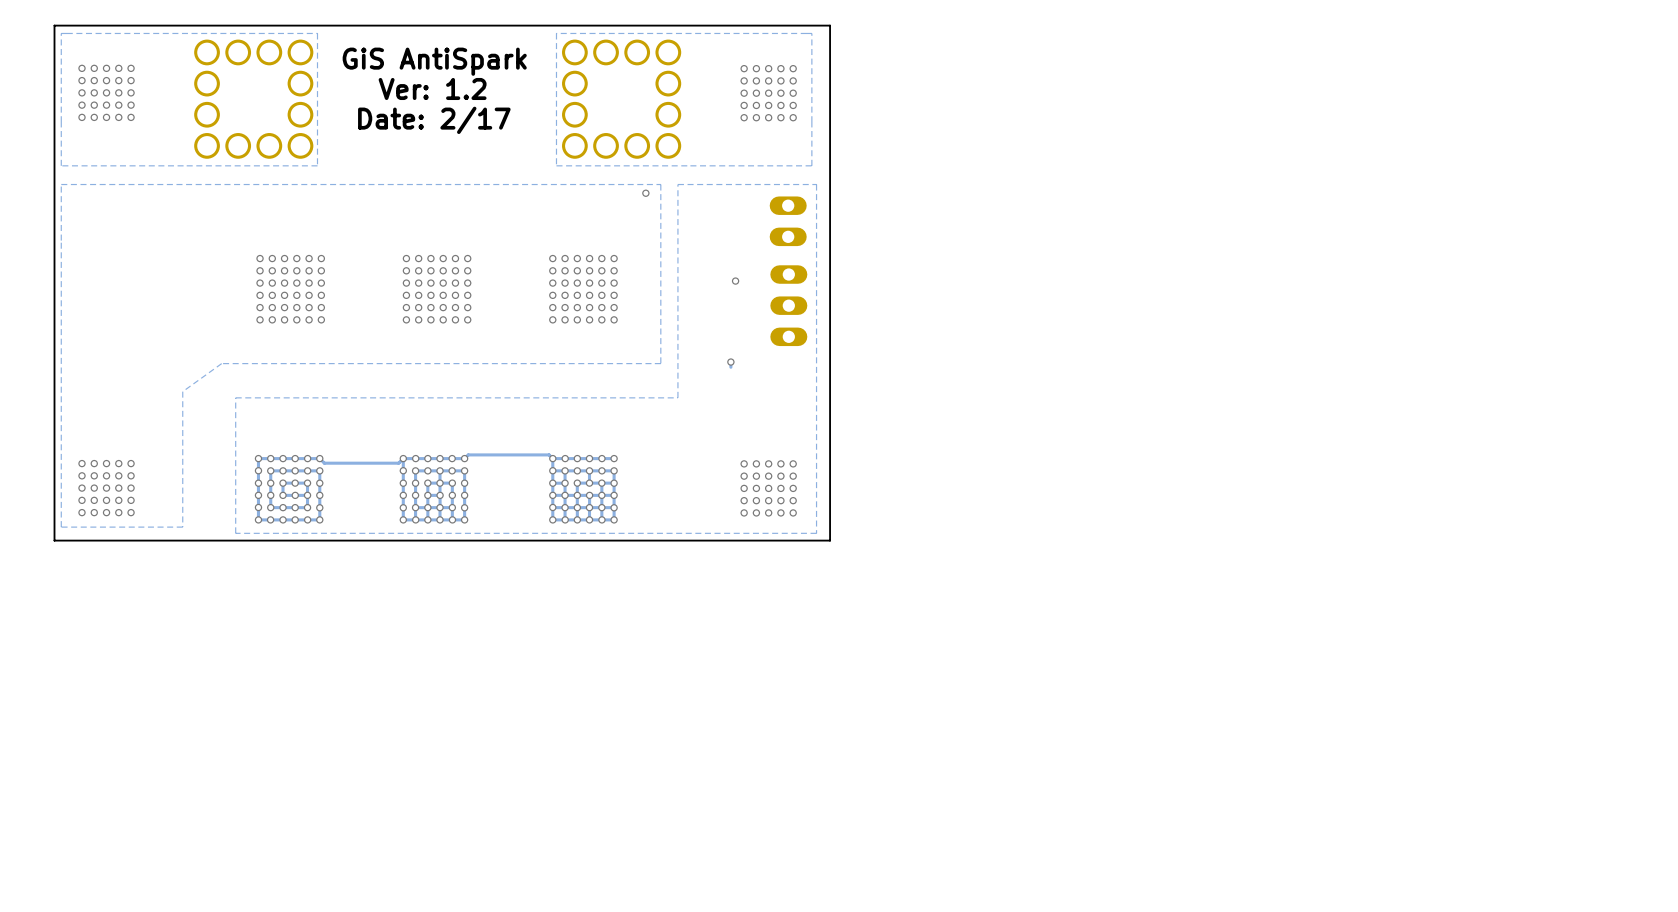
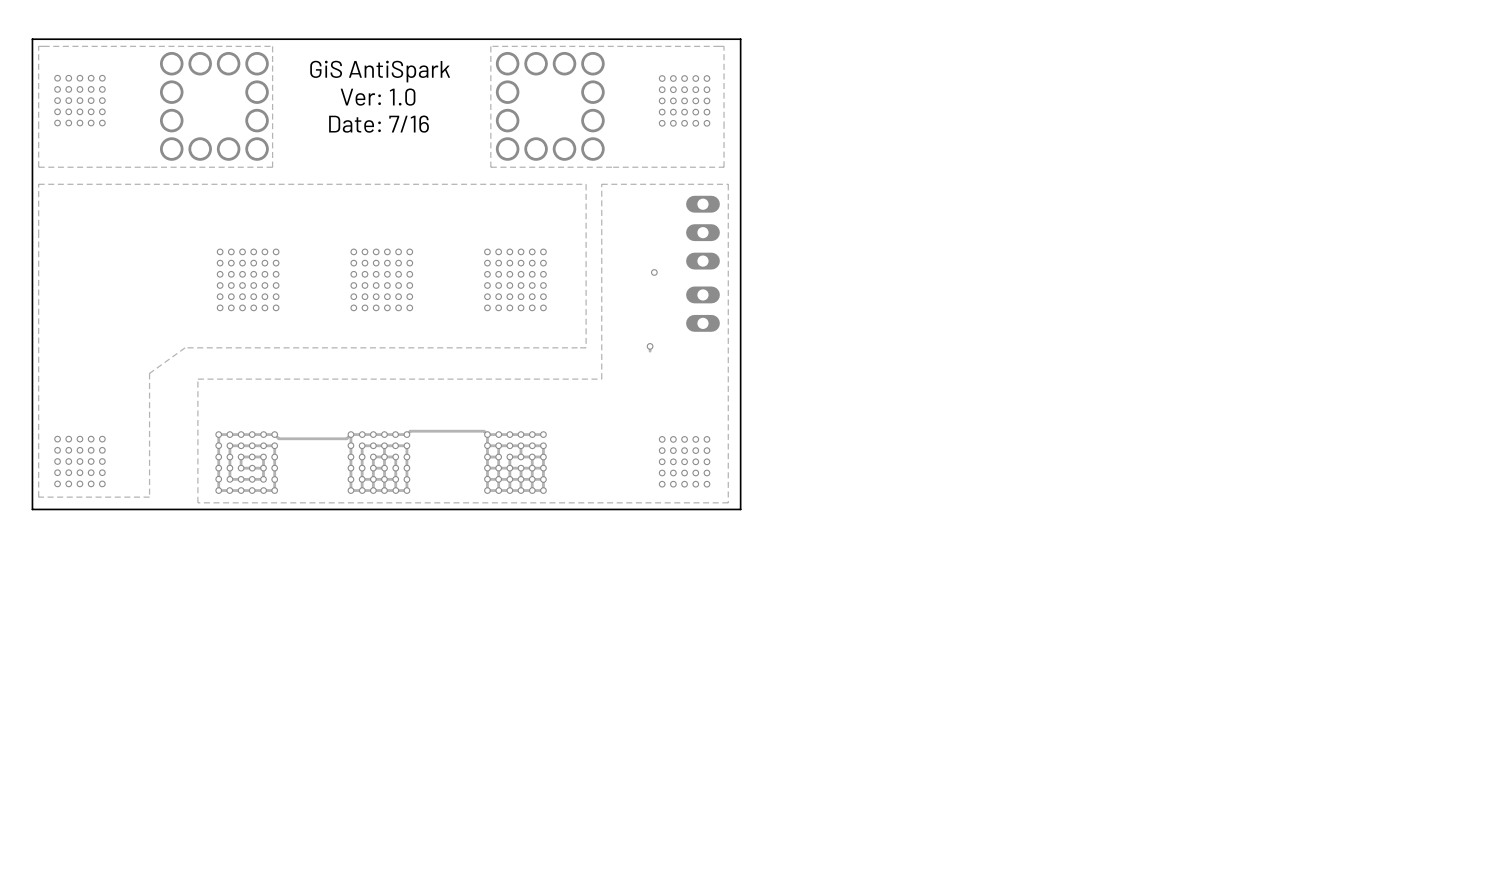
text: Ver: 1.2 (432, 88) -> Ver: 1.0 (378, 97)
text: Date: 2/17 (434, 120) -> Date: 7/16 (379, 124)
via: (645, 193) -> none
part position: (788, 221) -> (702, 309)
part position: (788, 305) -> (702, 232)

